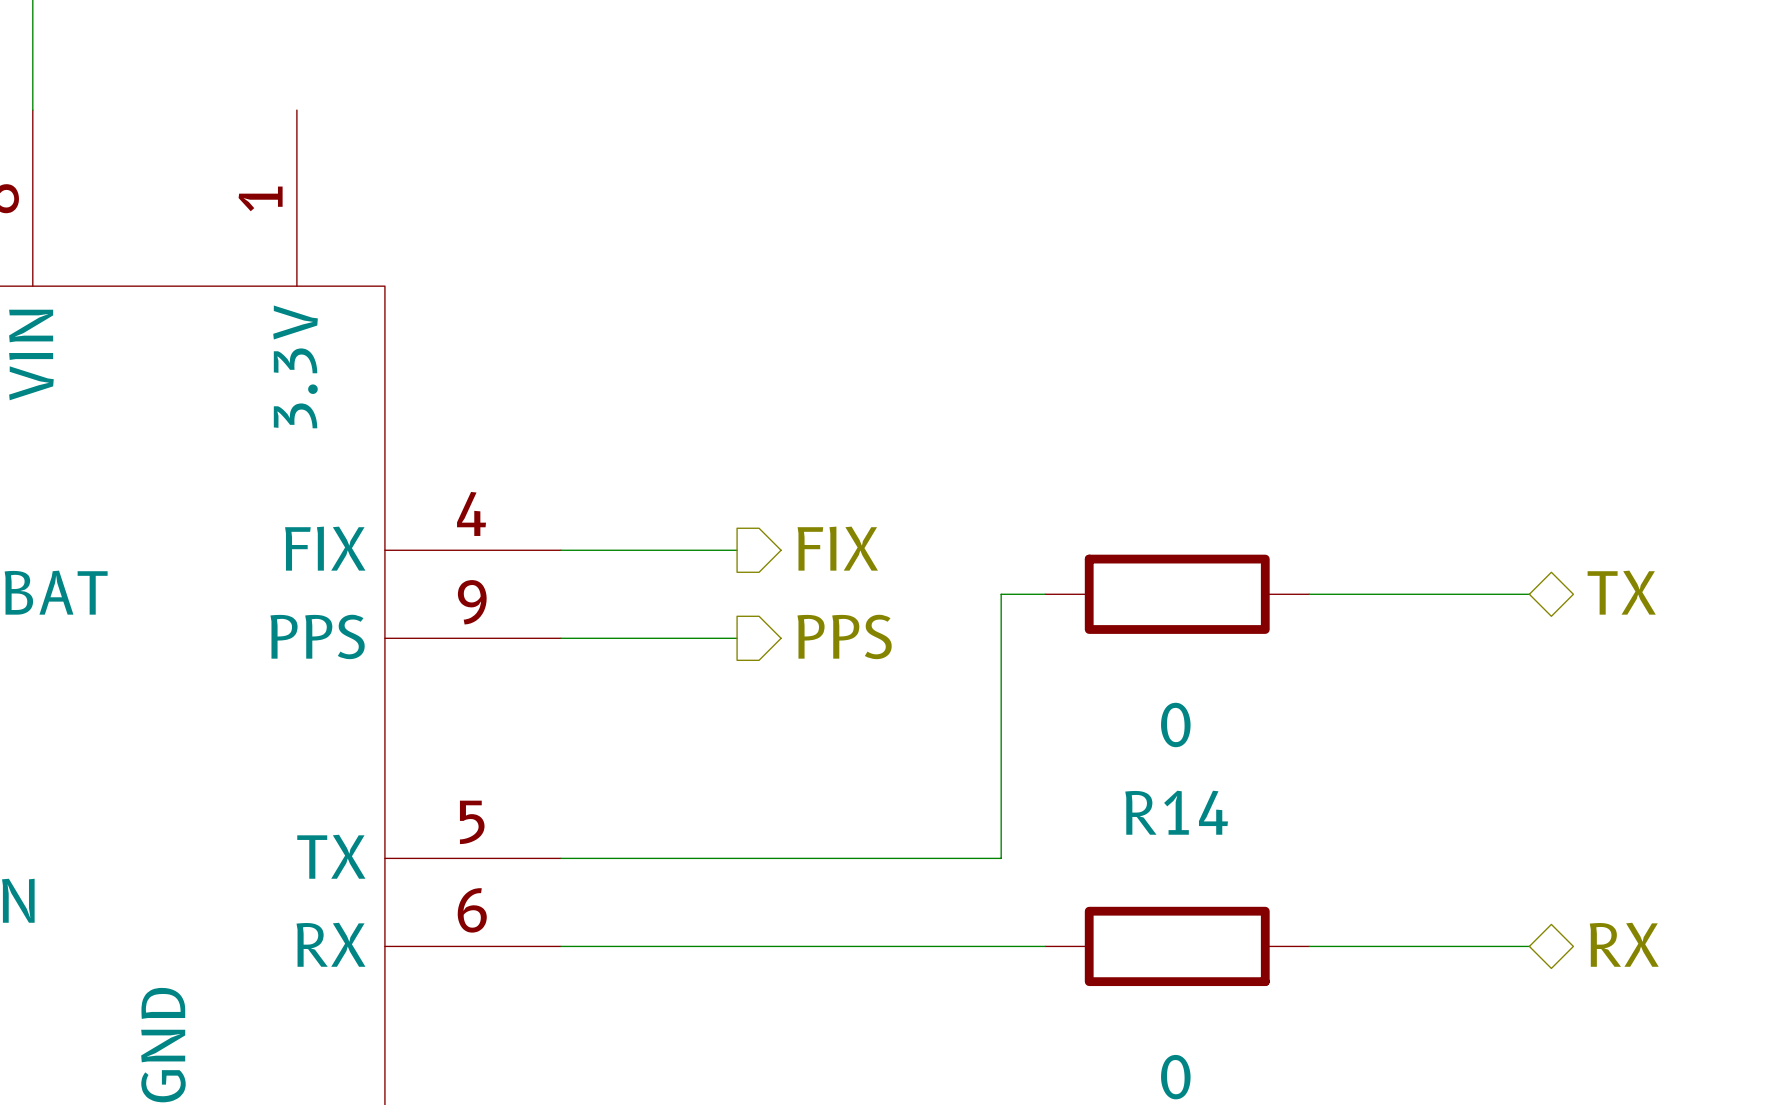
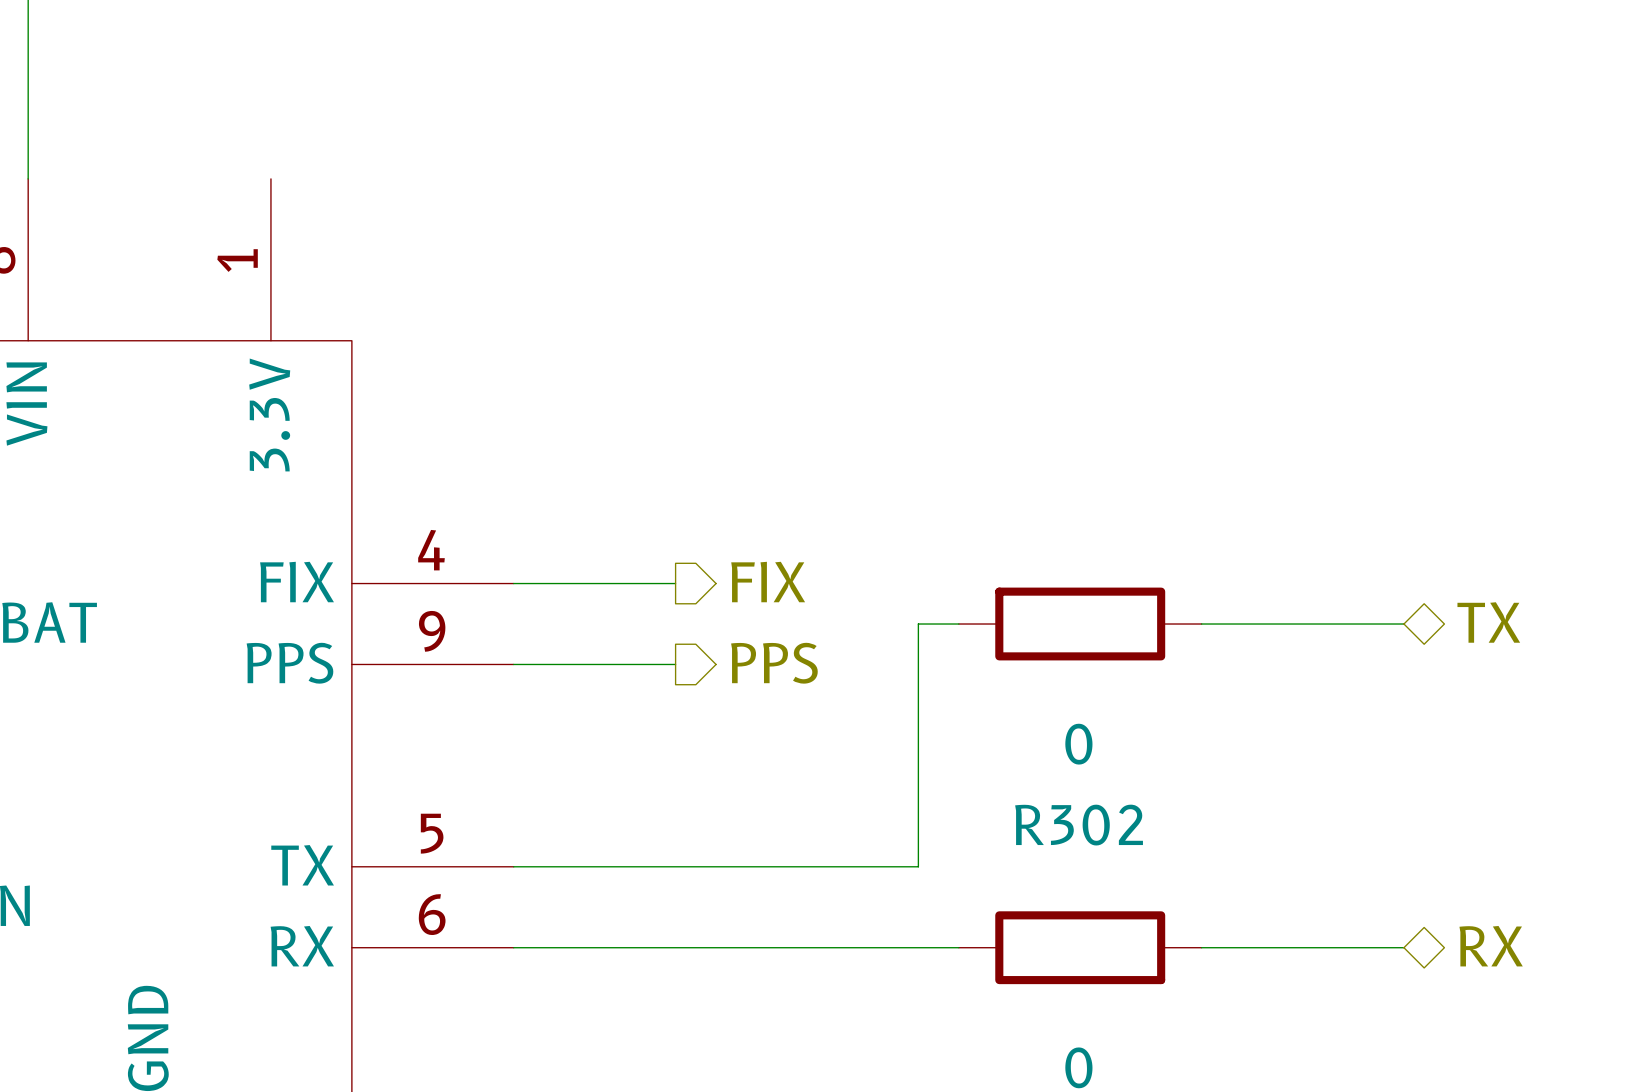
R14 name: R14 (1176, 812) -> R302 (1079, 825)

